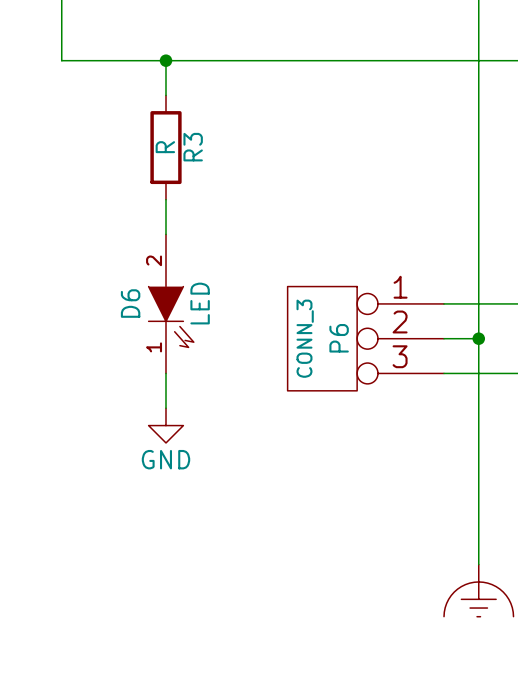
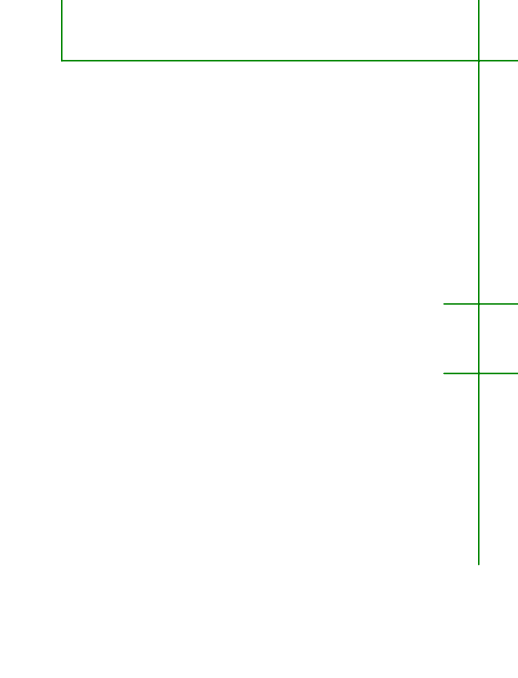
wire: (166, 60) (166, 95) -> none
junction: (166, 60) -> none
R3: R (166, 147) -> none
wire: (166, 199) (166, 234) -> none
D6: LED (171, 303) -> none
P6: CONN_3 (365, 338) -> none
wire: (444, 338) (478, 338) -> none
junction: (478, 338) -> none
wire: (166, 373) (166, 408) -> none
power symbol: GND (166, 425) -> none
power symbol: (478, 590) -> none

